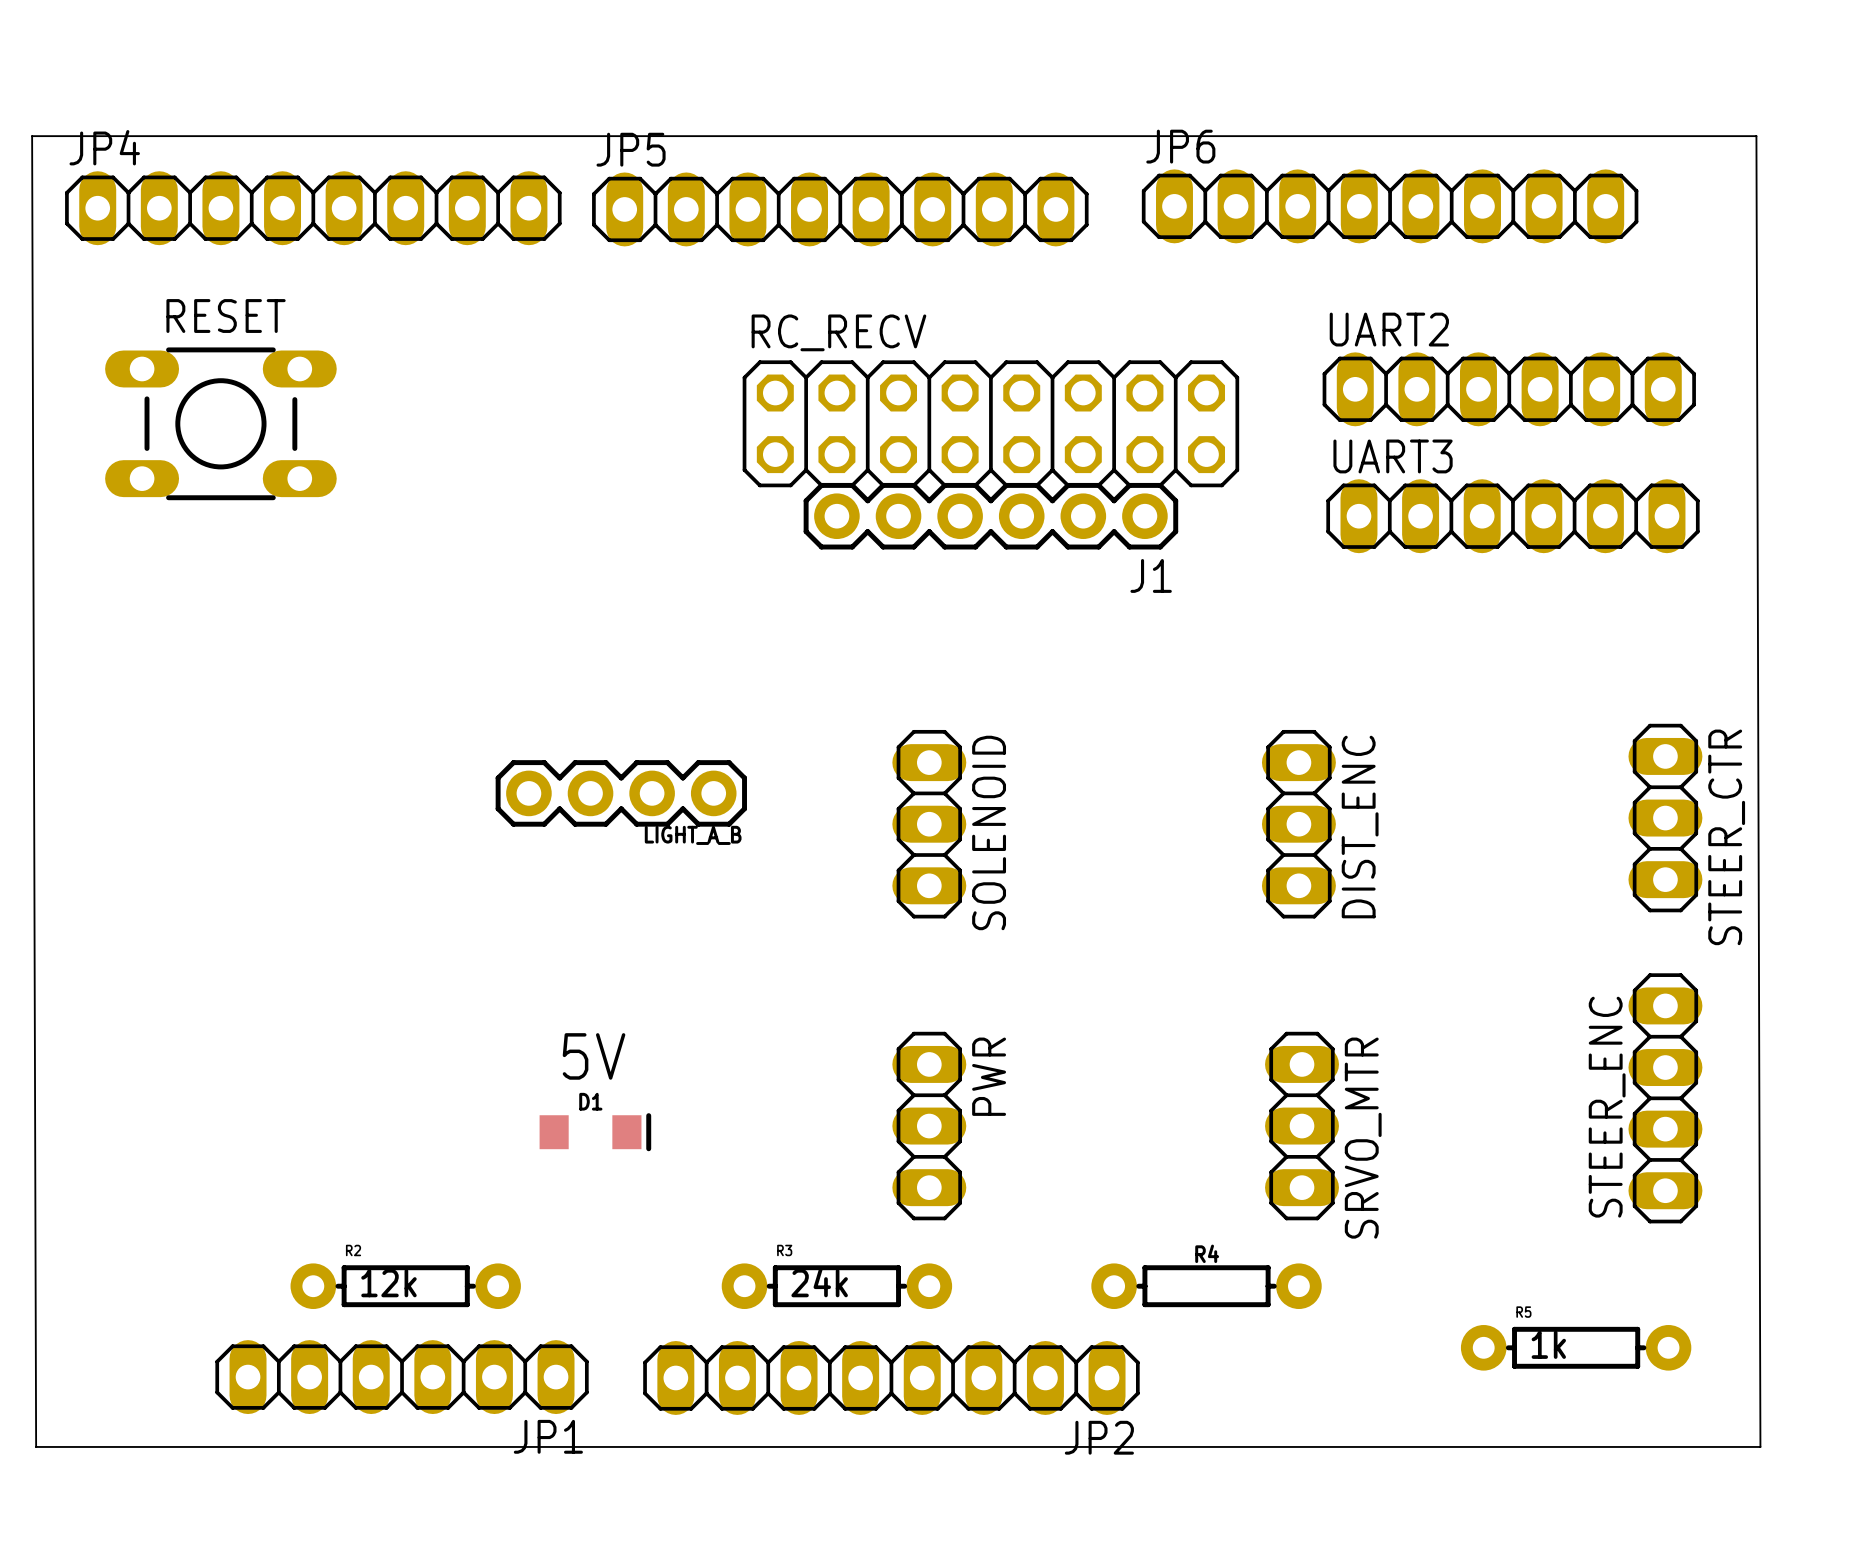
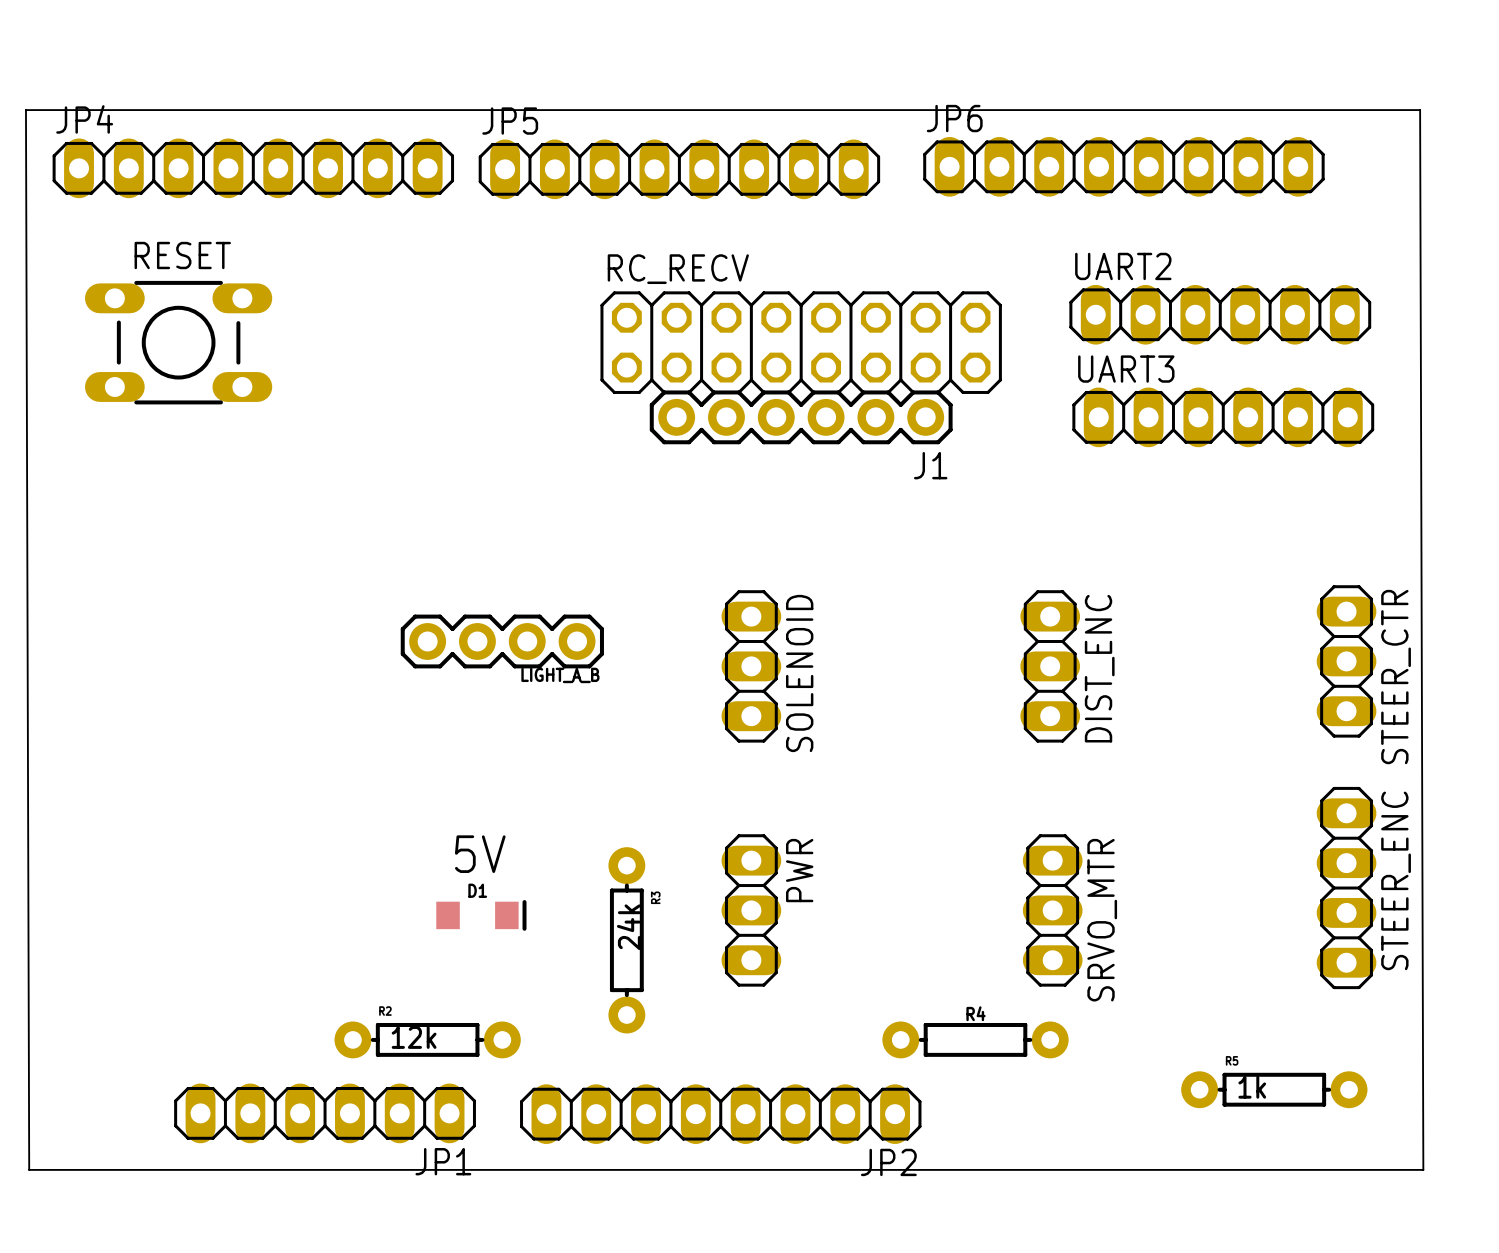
STEER_ENC name position: STEER_ENC (1607, 1107) -> STEER_ENC (1396, 880)
R2 position: (405, 1286) -> (427, 1039)
R3 rotation: 0° (836, 1286) -> 90° clockwise (626, 940)

